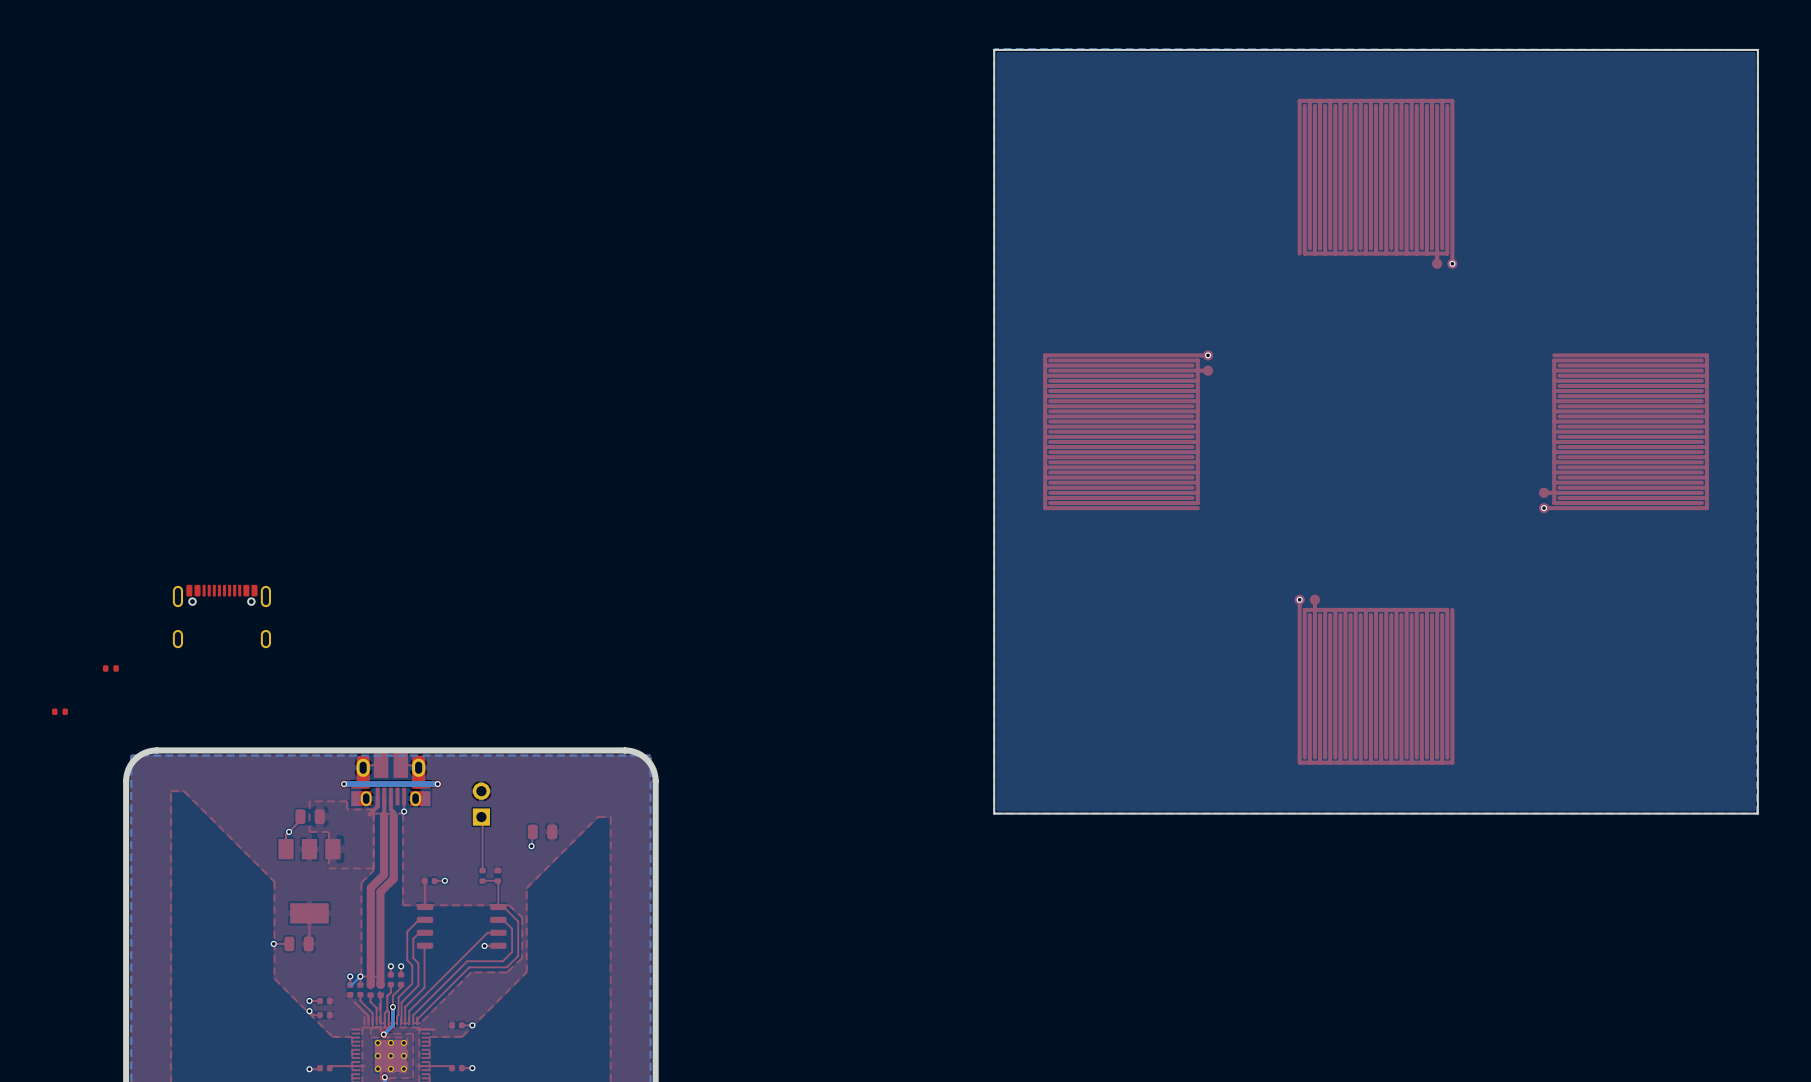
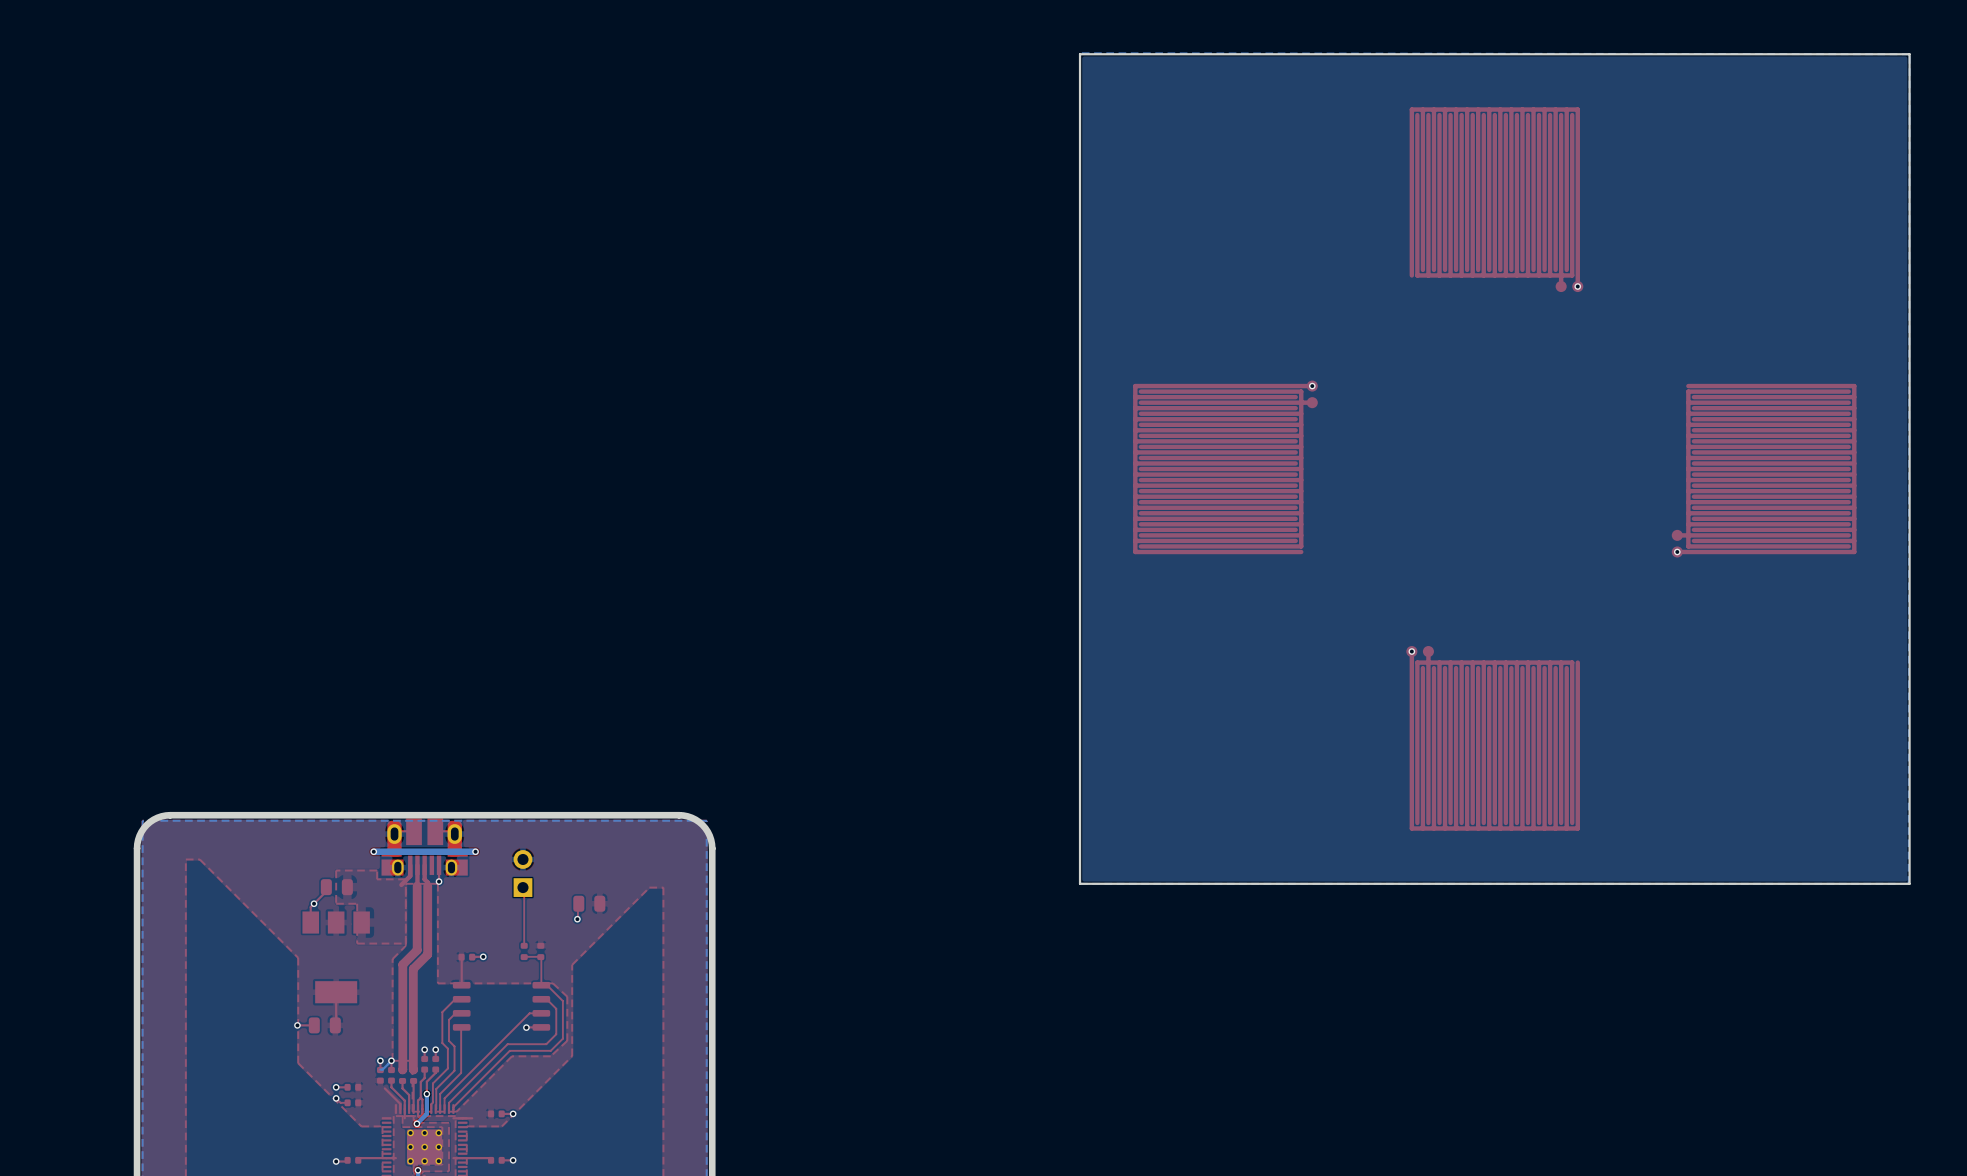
part: (221, 616) -> none
part: (110, 668) -> none
part: (59, 711) -> none

